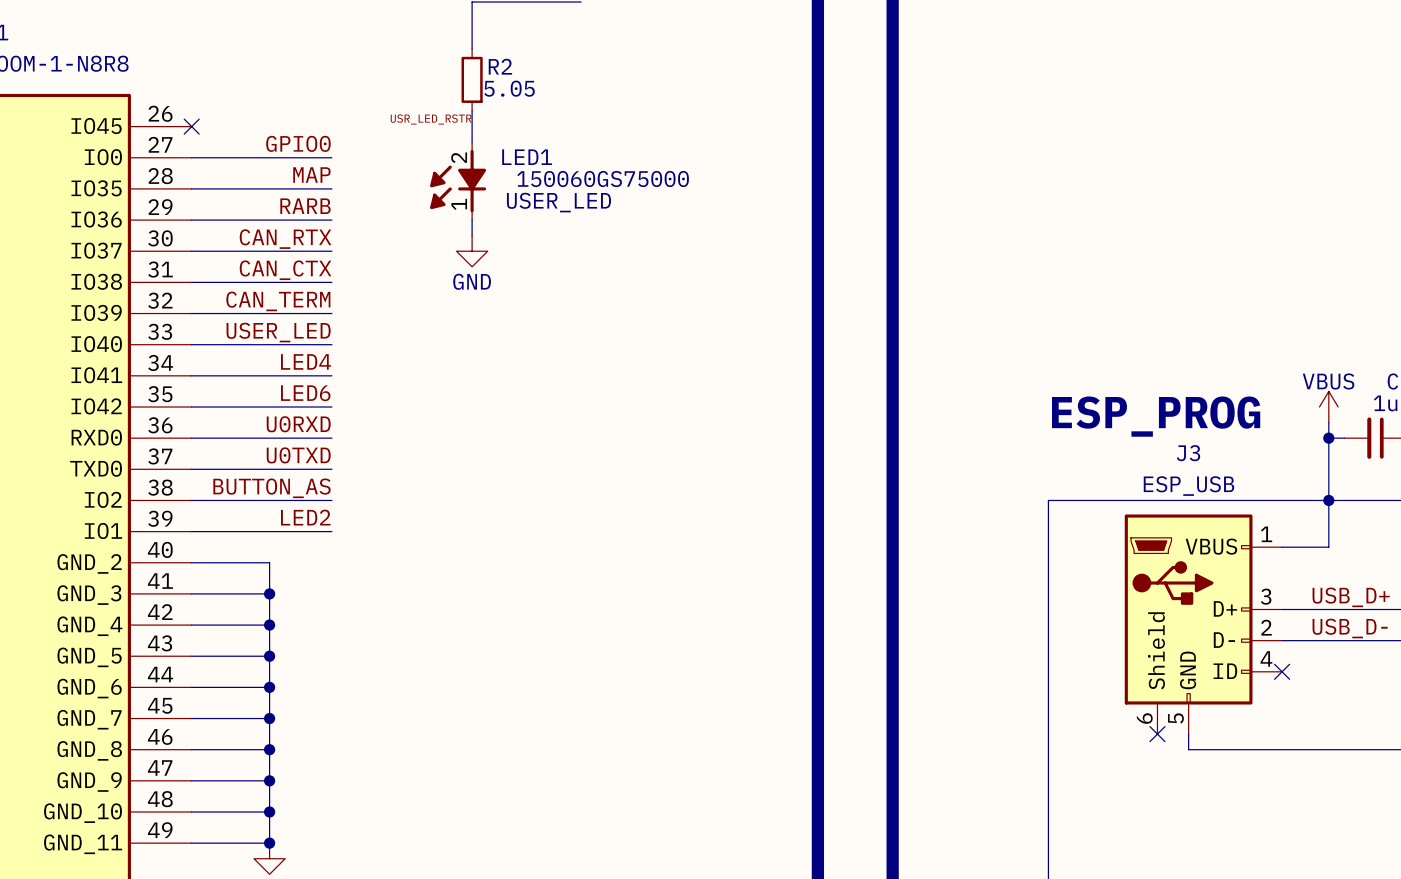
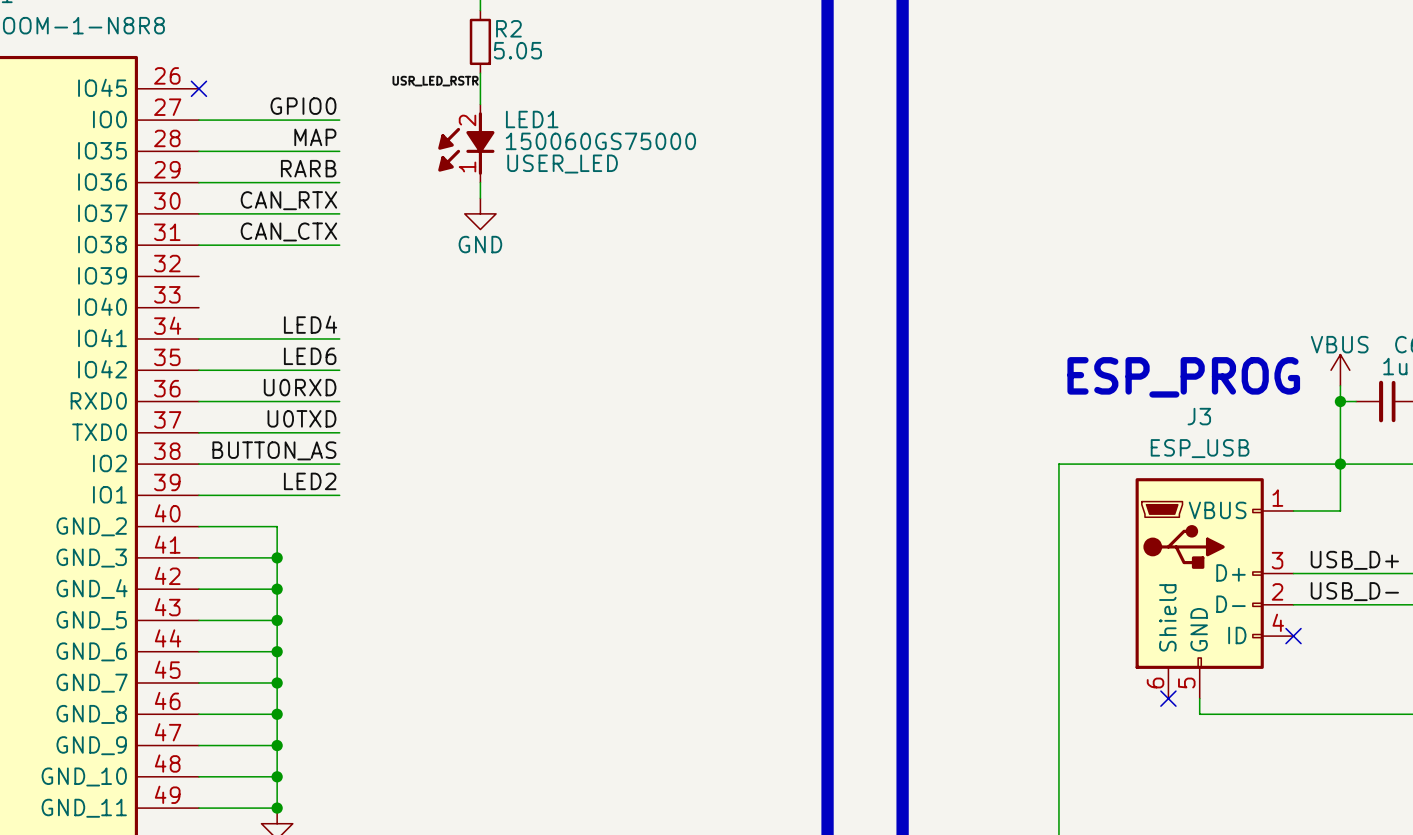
label: CAN_TERM (278, 301) -> none
wire: (191, 313) (331, 313) -> none
label: USER_LED (278, 332) -> none
wire: (191, 344) (331, 344) -> none

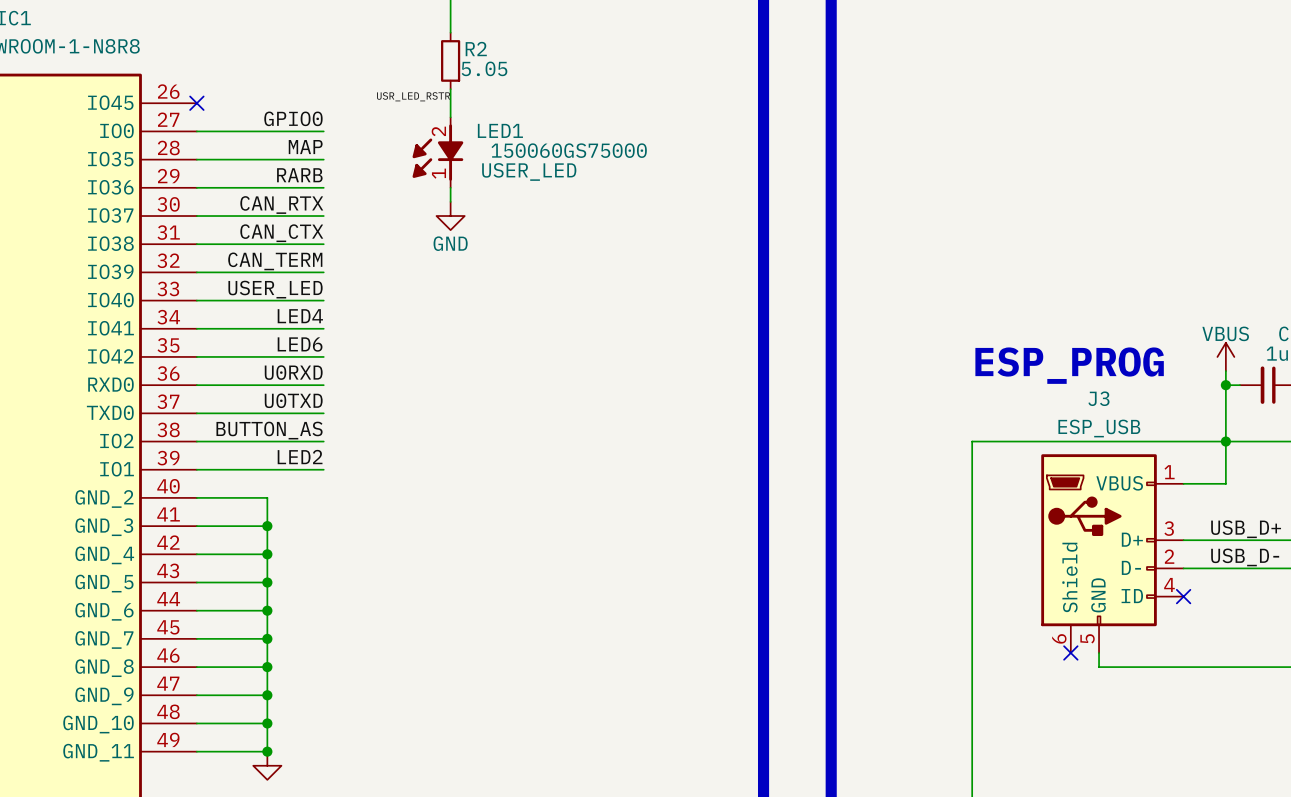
label: none -> CAN_TERM (275, 261)
wire: none -> (196, 272) (323, 272)
label: none -> USER_LED (275, 289)
wire: none -> (196, 300) (323, 300)

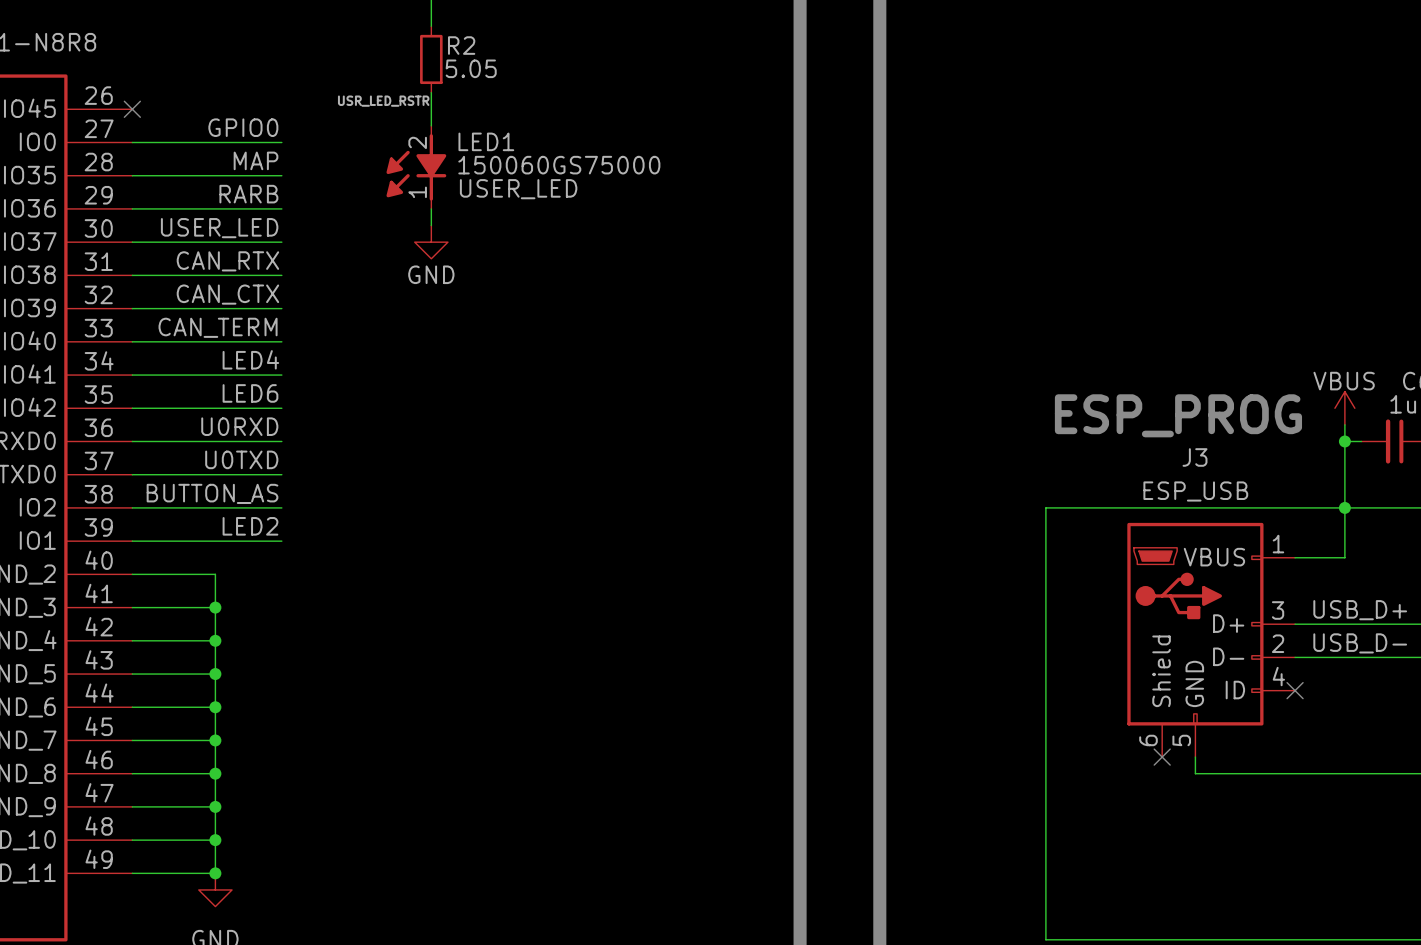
label: CAN_RTX (281, 205) -> USER_LED (219, 228)
label: CAN_CTX (281, 233) -> CAN_RTX (227, 261)
label: CAN_TERM (275, 261) -> CAN_CTX (227, 294)
label: USER_LED (275, 289) -> CAN_TERM (218, 327)

